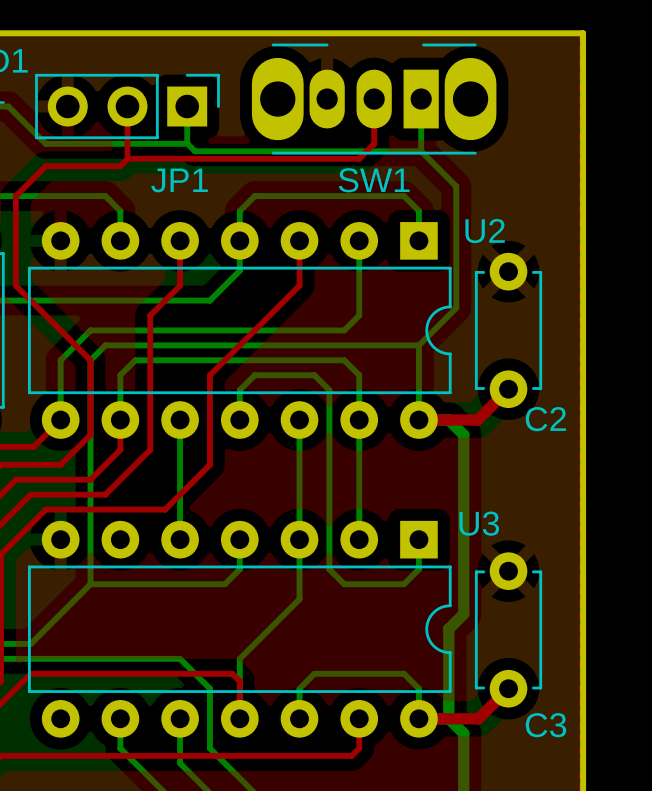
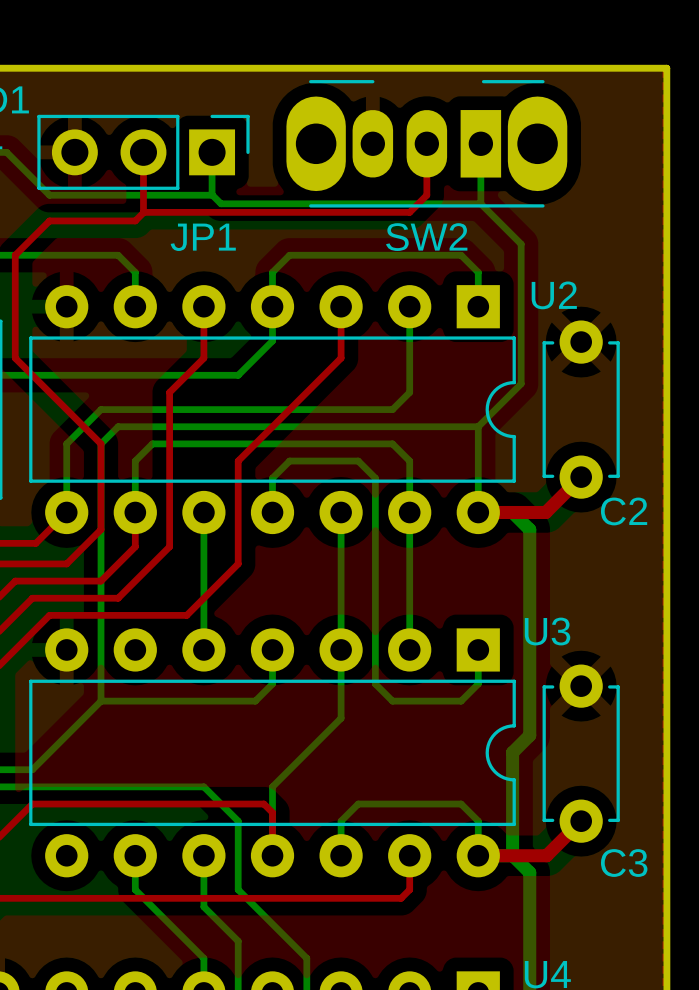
SW1 name: SW1 (374, 180) -> SW2 (426, 237)

